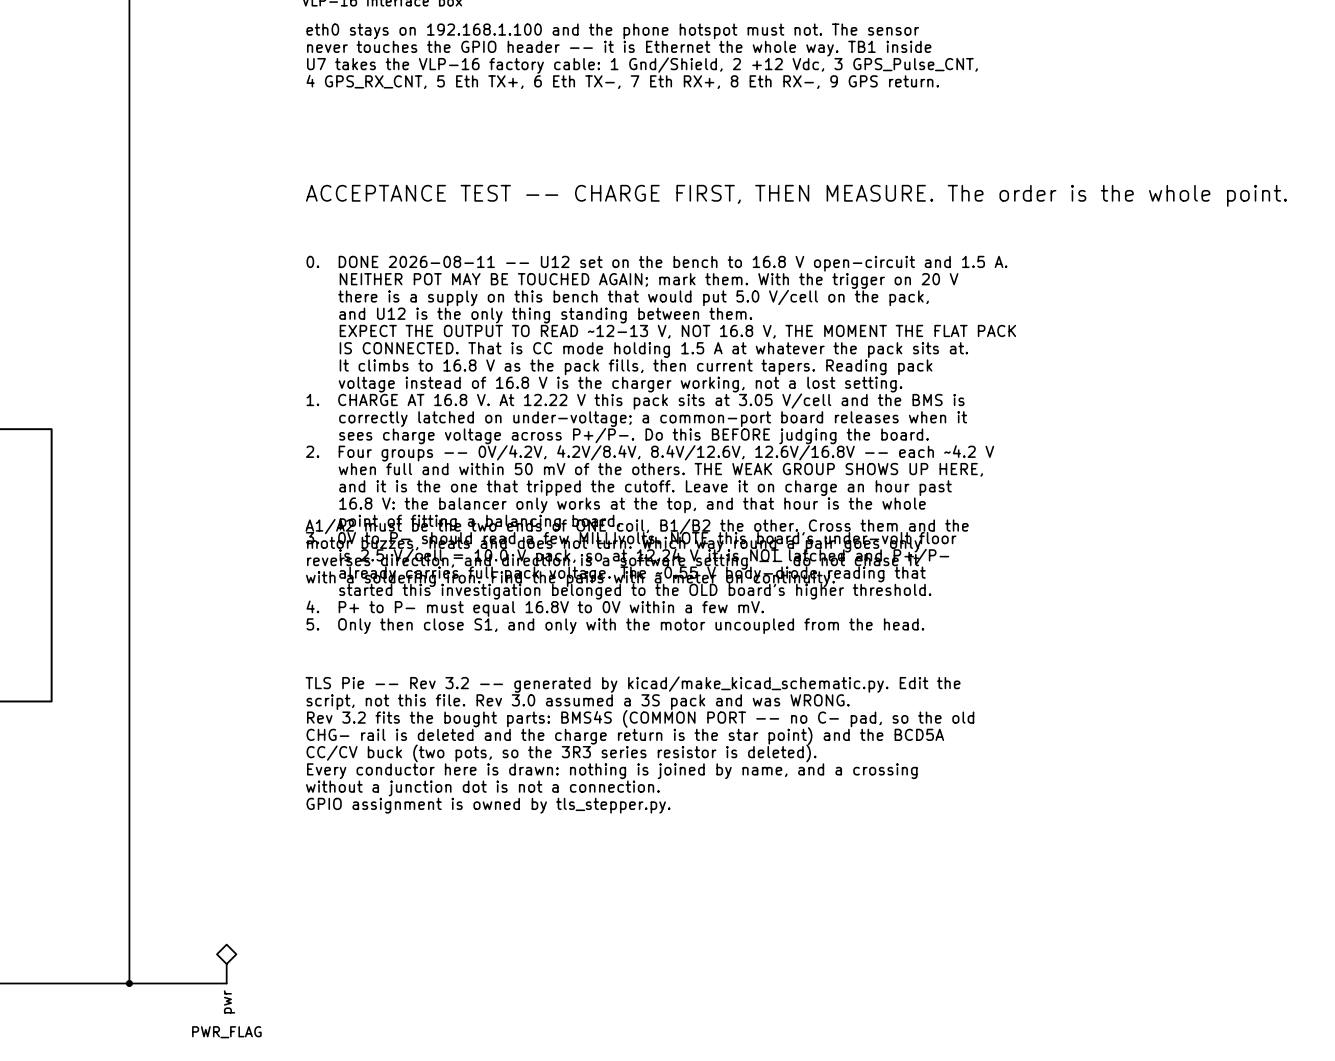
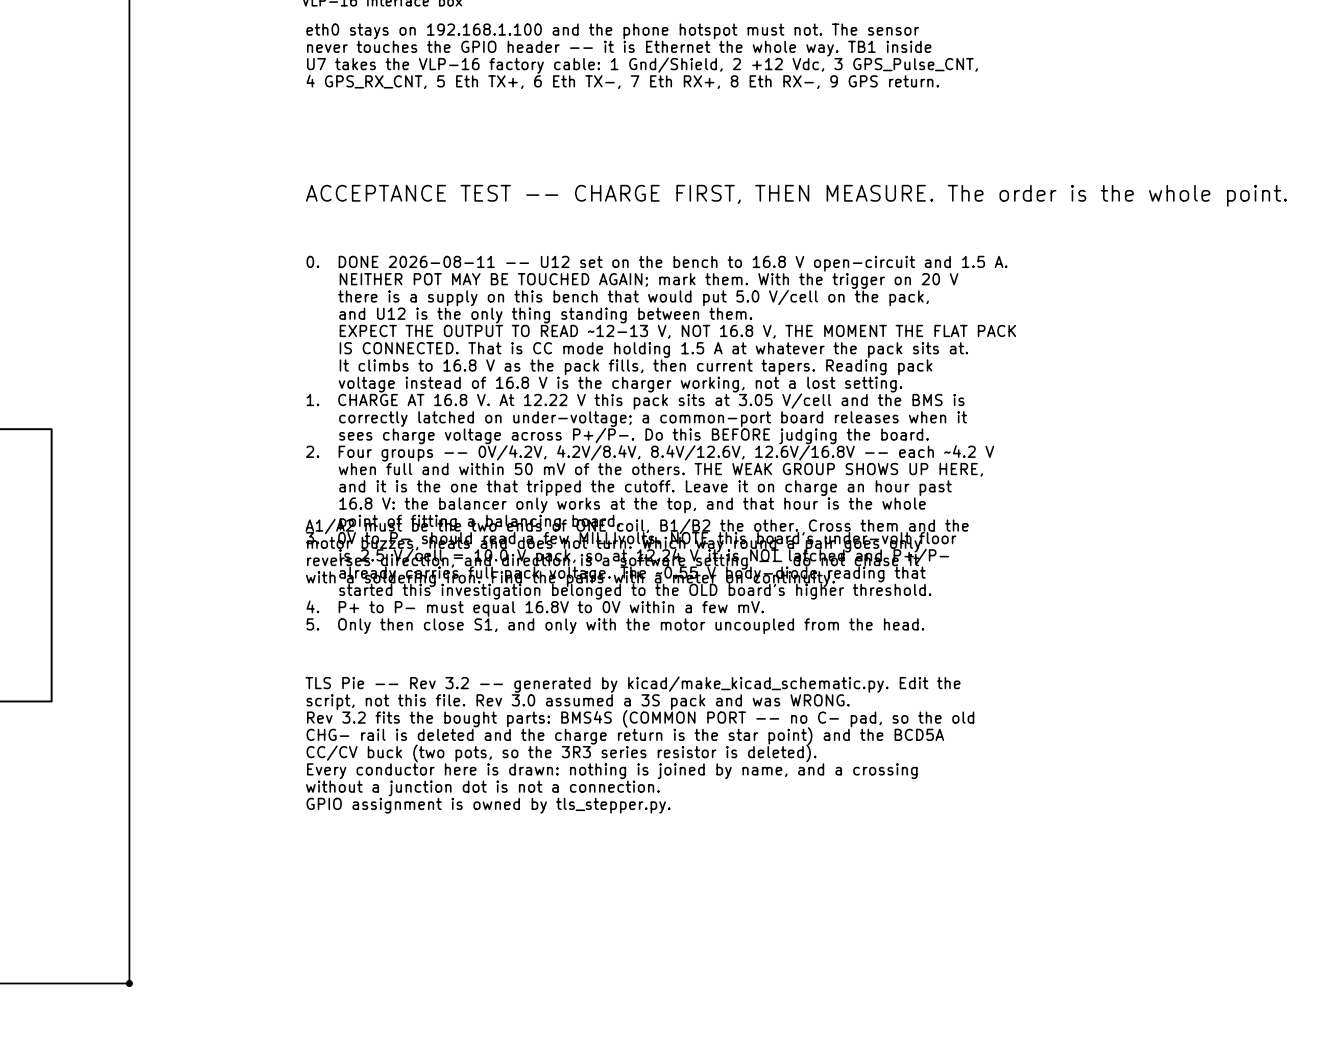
power symbol: PWR_FLAG (226, 964) -> none
wire: (129, 983) (226, 983) -> none

